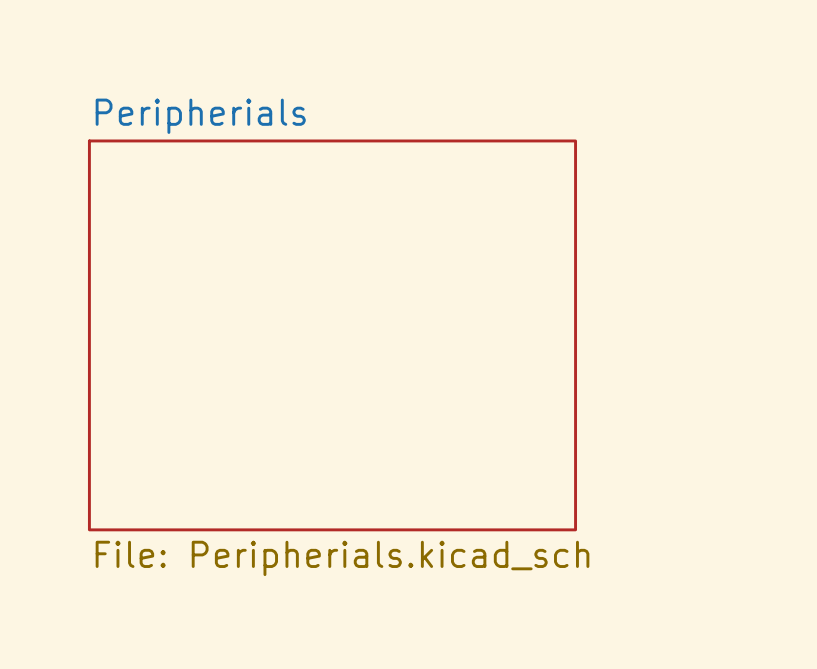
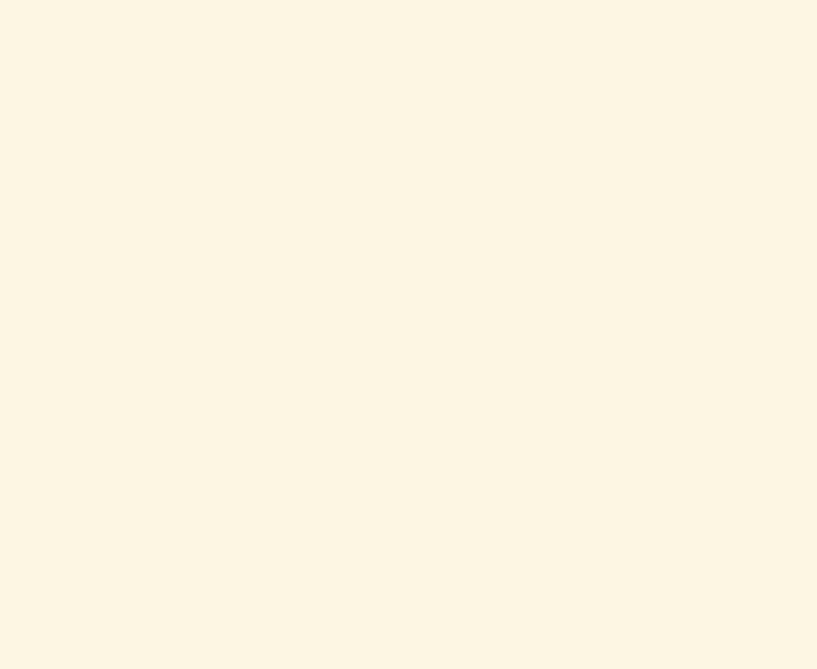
sheet Peripherials: File: Peripherials.kicad_sch (332, 335) -> none

